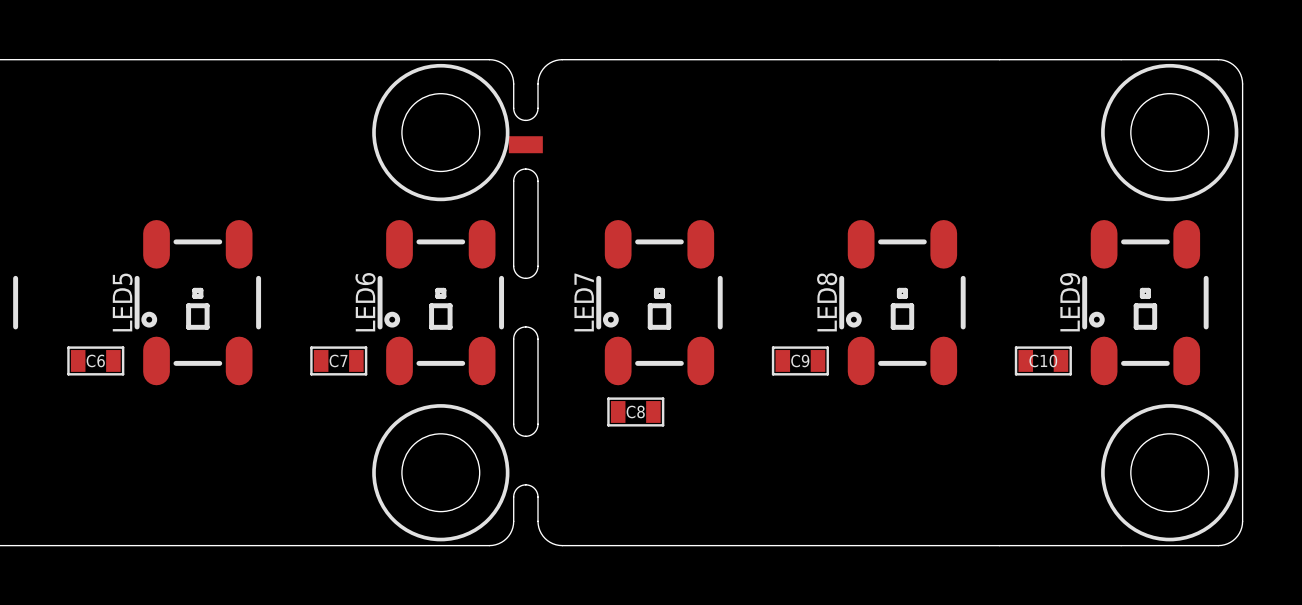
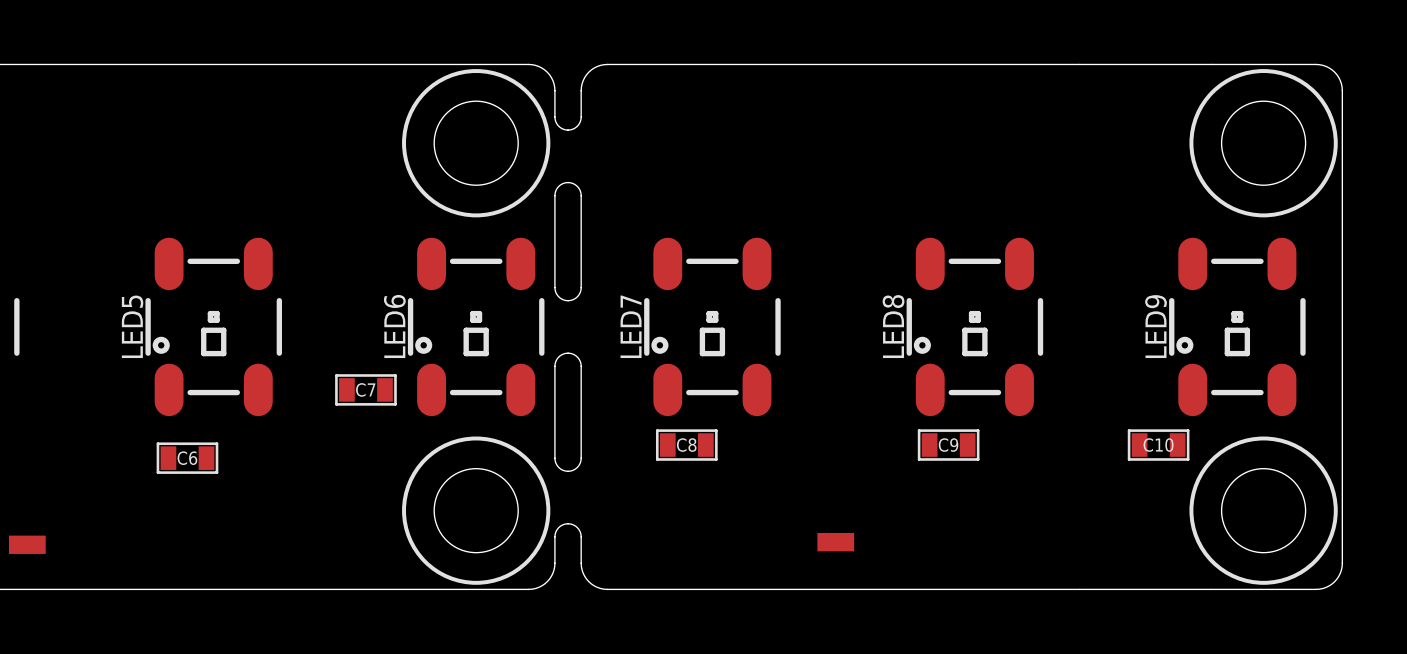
part: (525, 144) -> none
C6 position: (95, 360) -> (187, 458)
C9 position: (800, 360) -> (948, 445)
C10 position: (1043, 360) -> (1158, 445)
part: none -> (835, 542)
part: none -> (27, 544)

